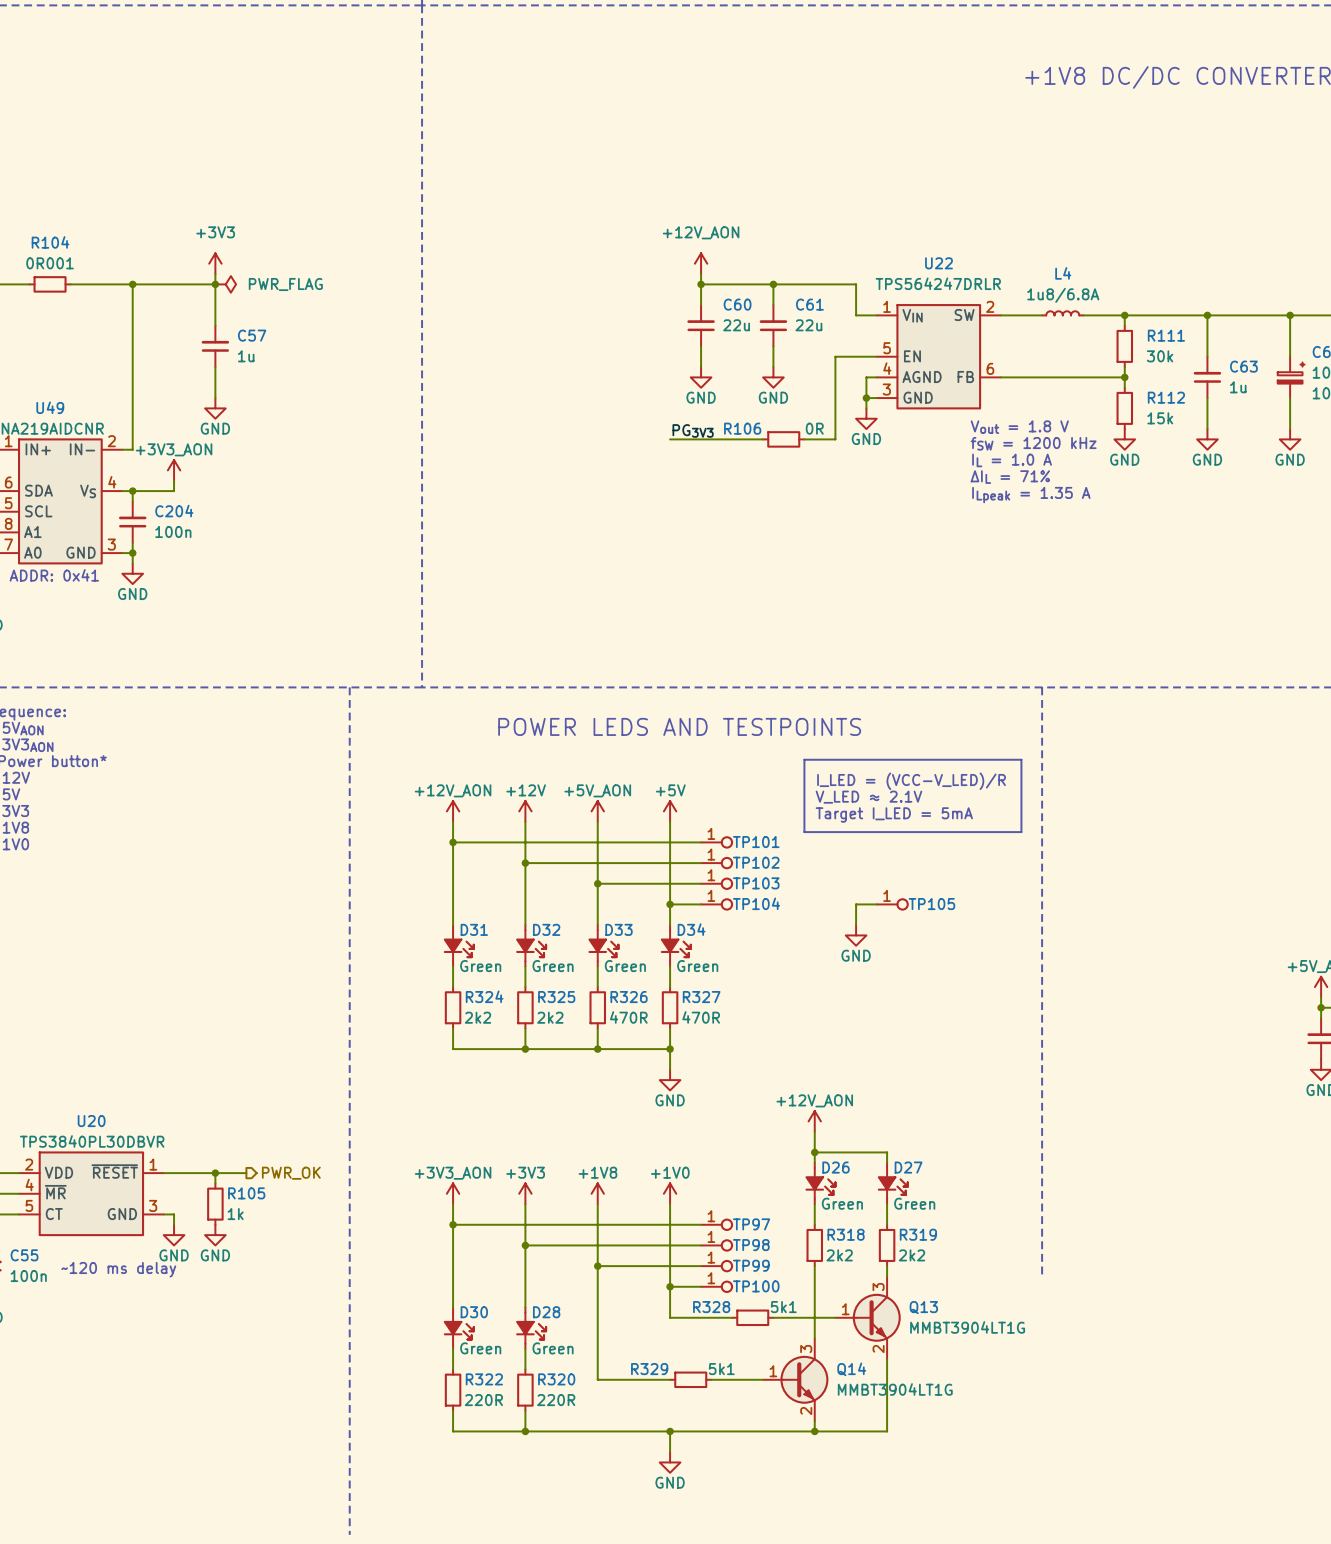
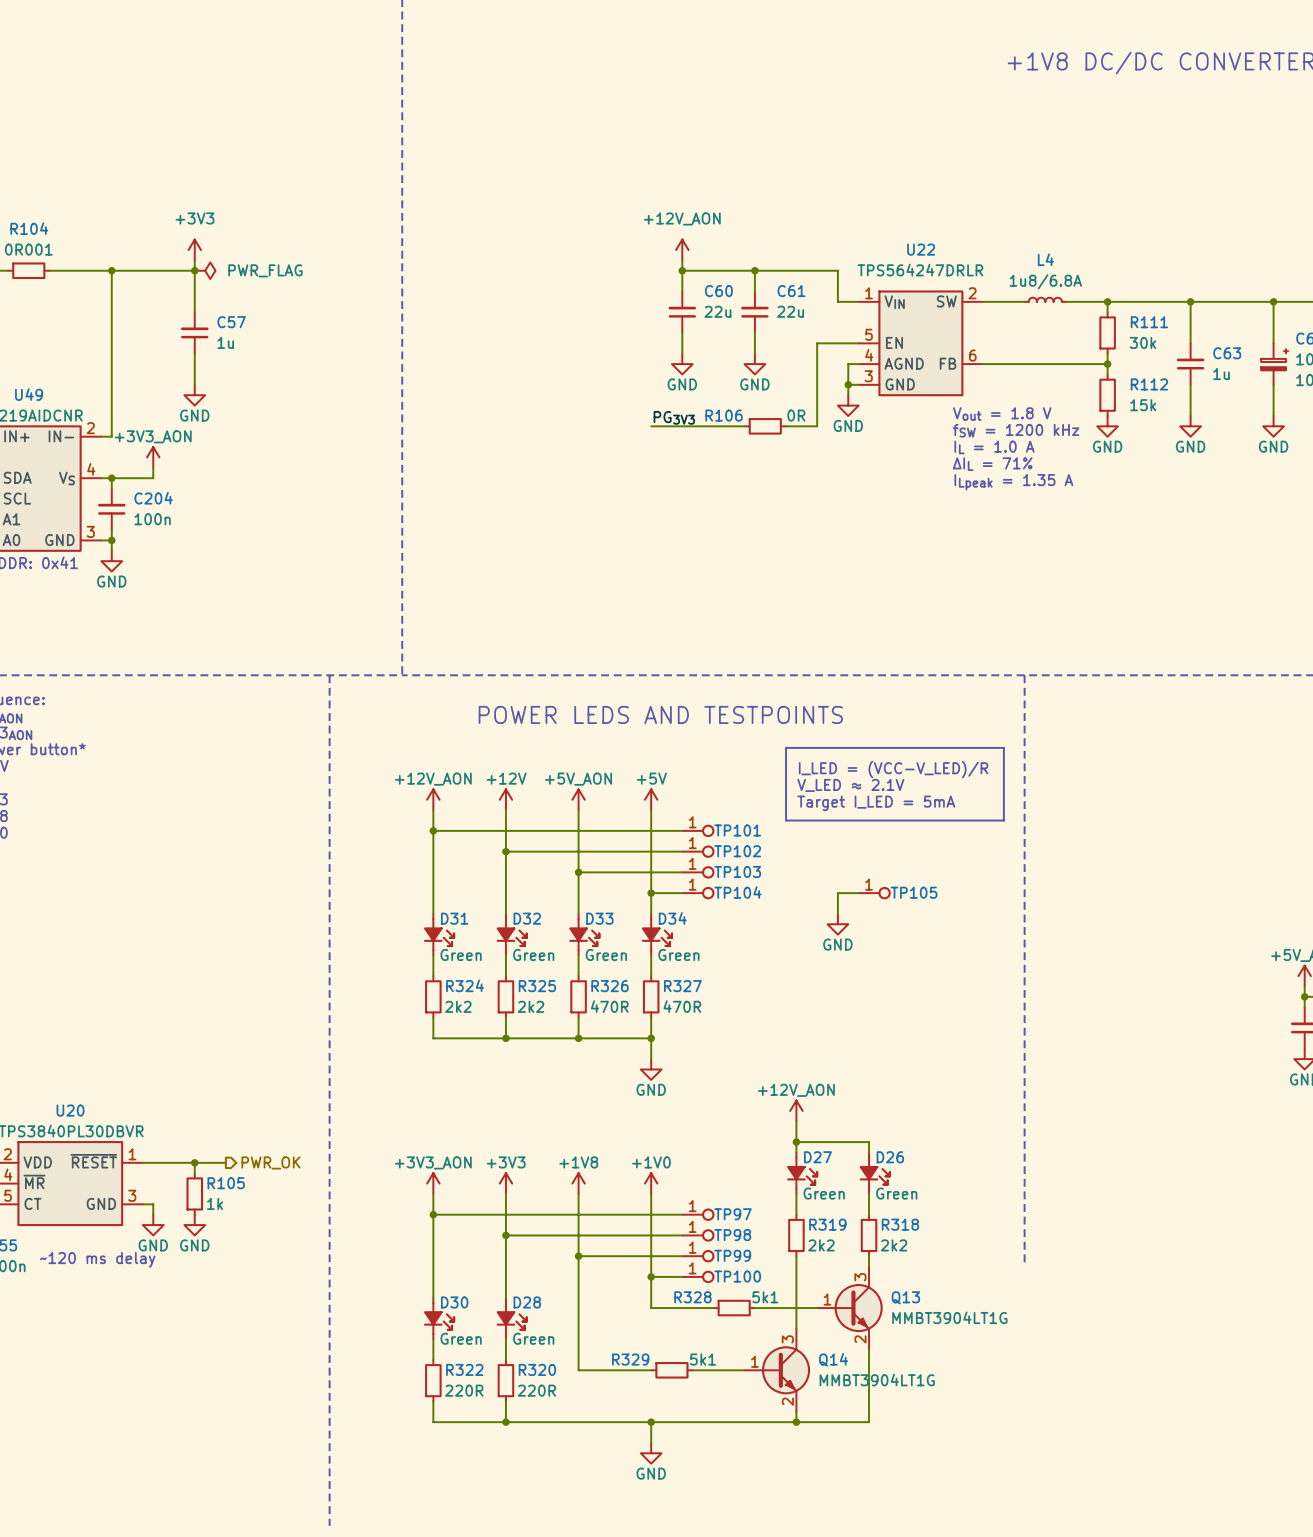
D26 name: D26 (835, 1167) -> D27 (817, 1157)
D27 name: D27 (908, 1167) -> D26 (890, 1157)
R318 name: R318 (846, 1234) -> R319 (827, 1224)
R319 name: R319 (918, 1234) -> R318 (900, 1224)

